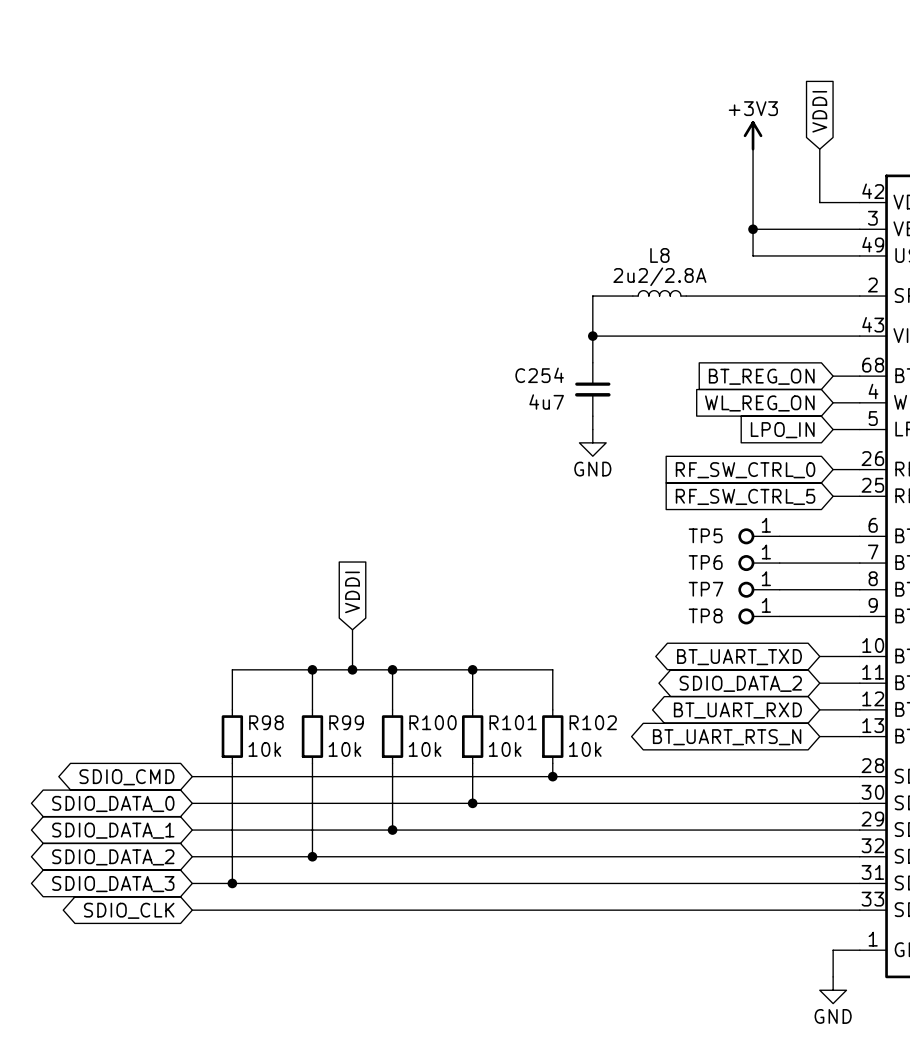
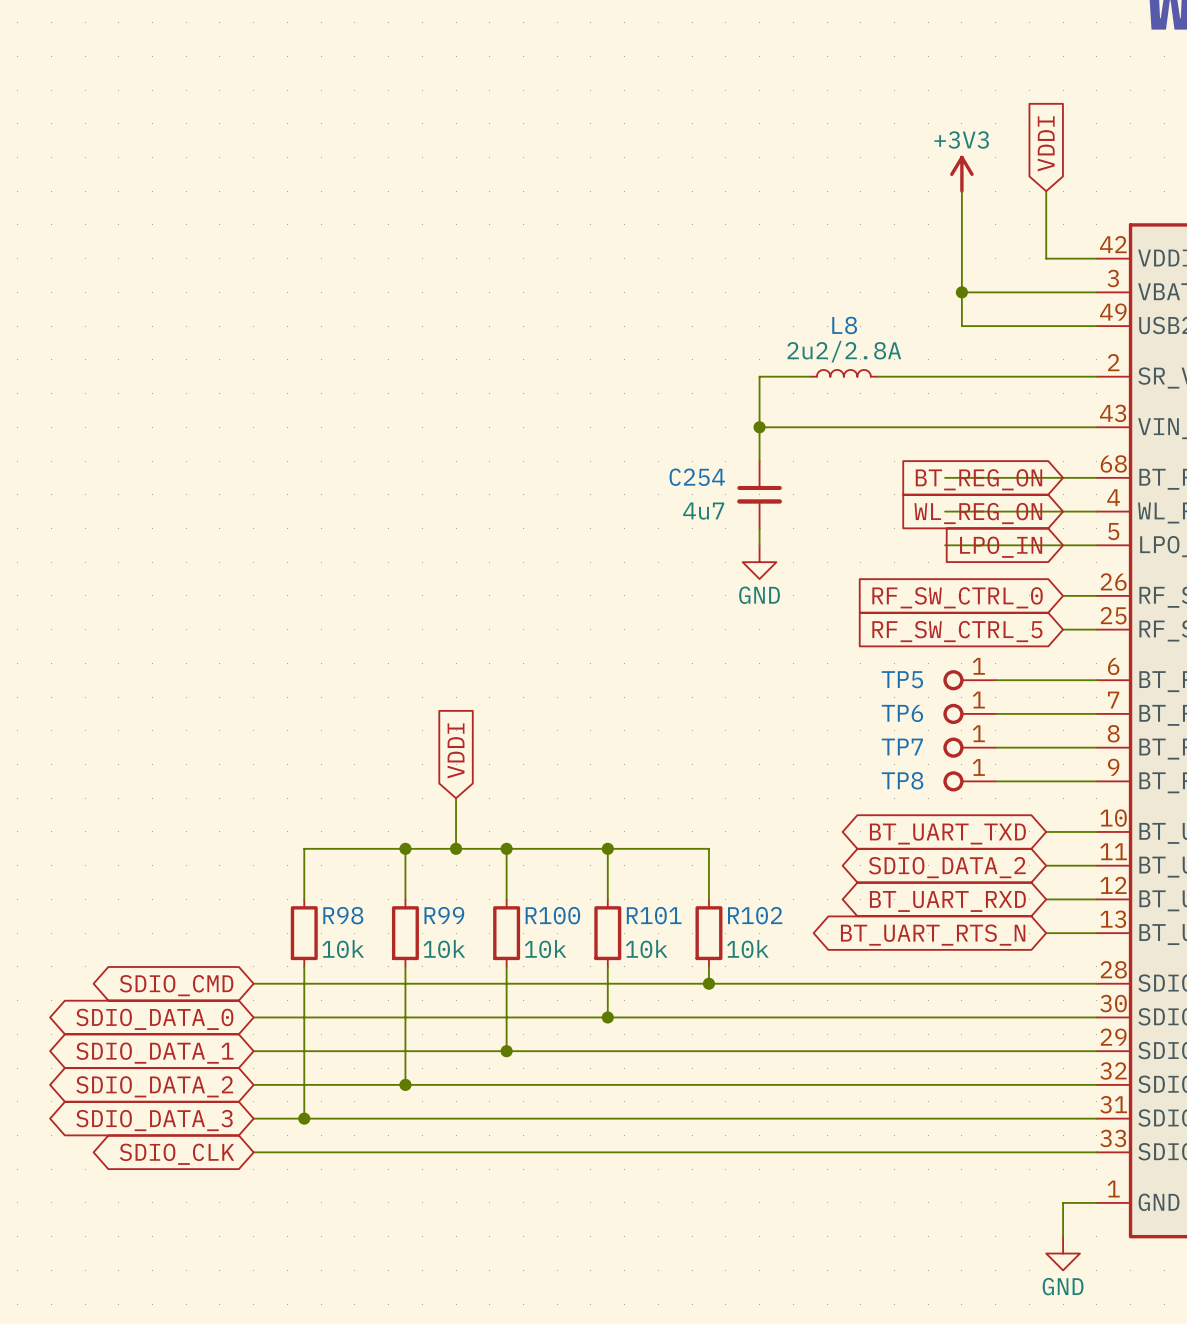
wire: none -> (945, 477) (1063, 477)
wire: none -> (945, 511) (1063, 511)
wire: none -> (945, 545) (1063, 545)

